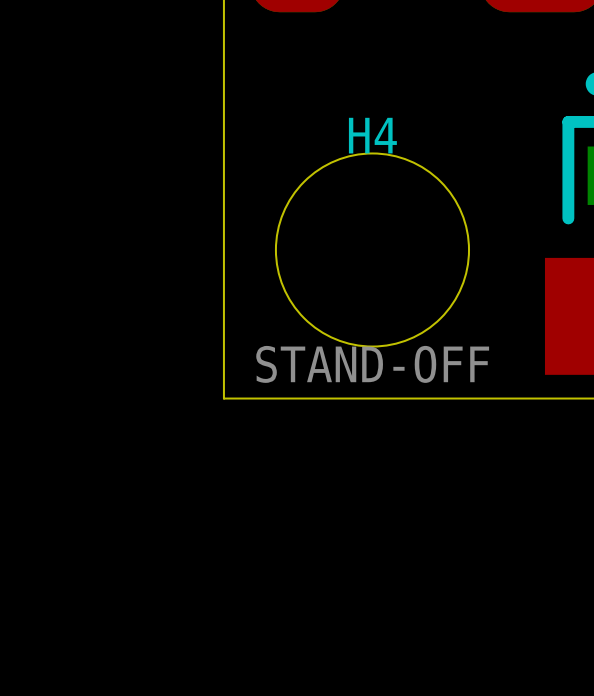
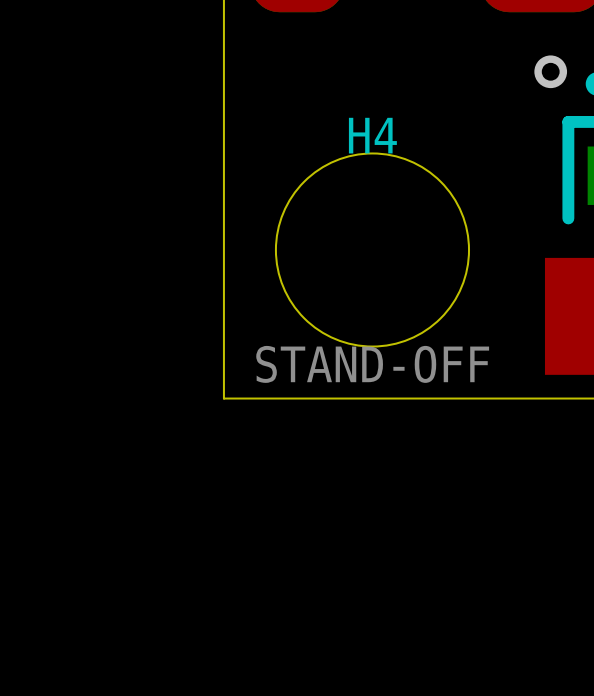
via: none -> (550, 71)

